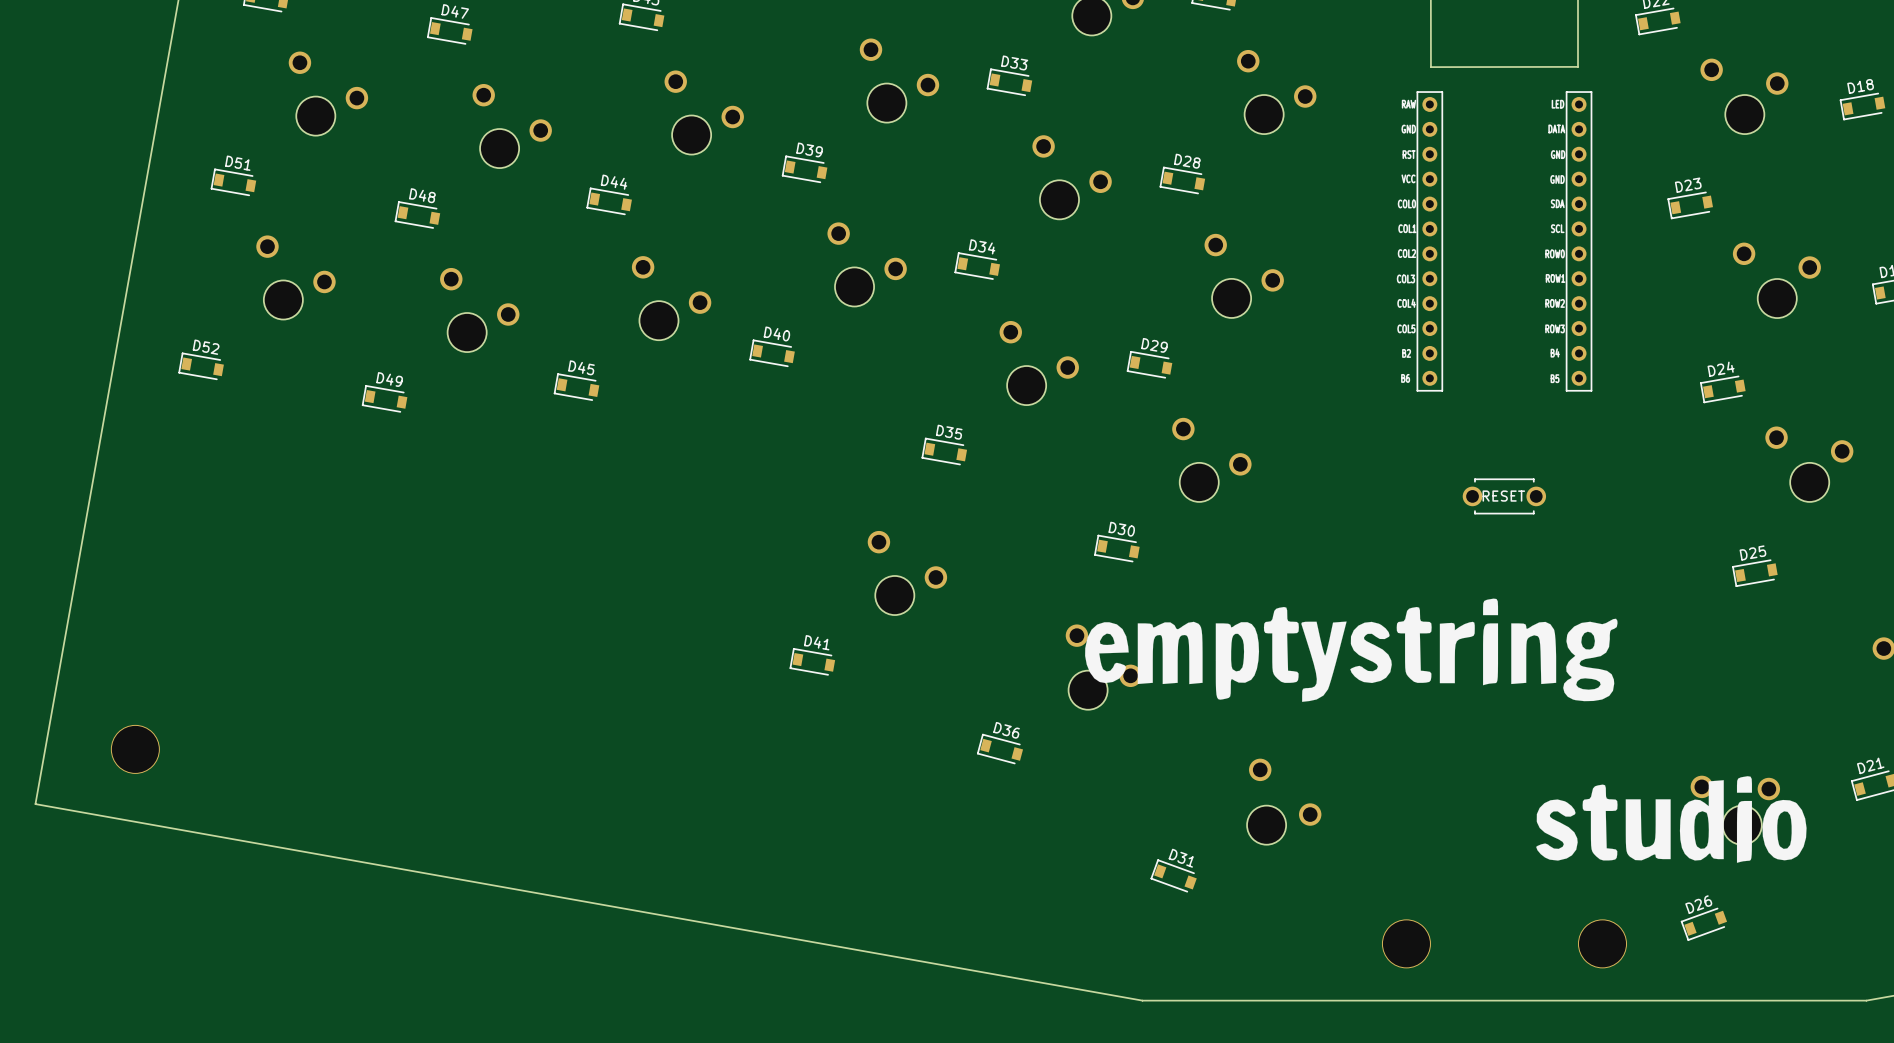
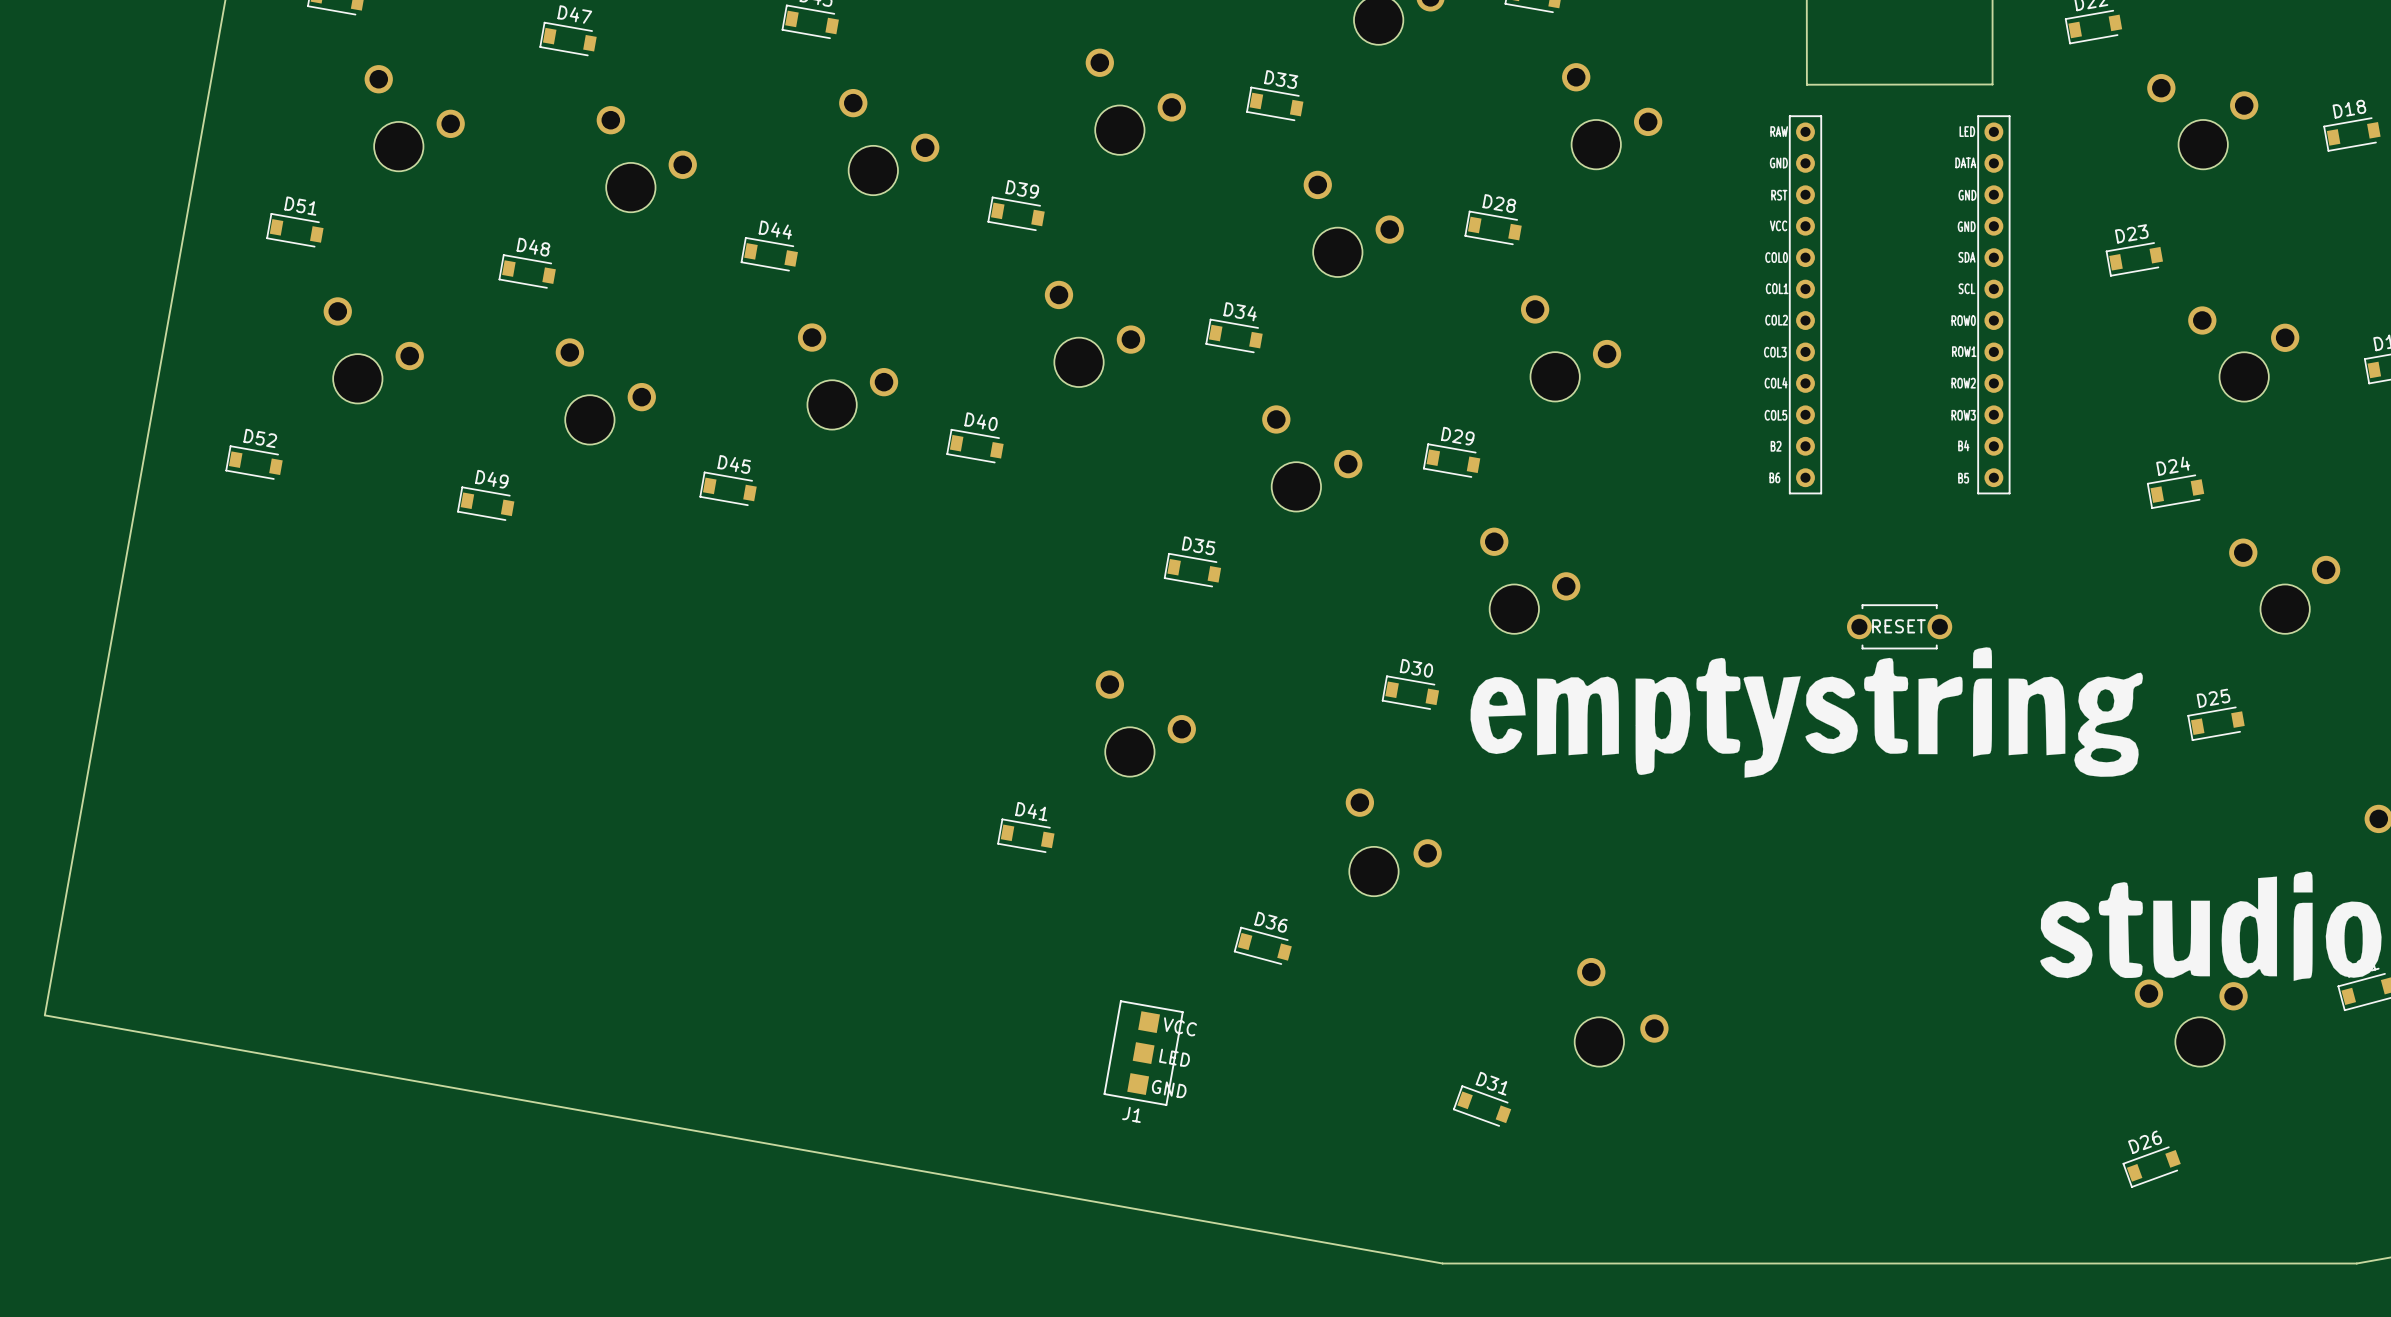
drawing position: (1445, 730) -> (1926, 814)
part: (135, 749) -> none
J1: none -> (1143, 1053)
part: (1406, 943) -> none
part: (1602, 943) -> none

